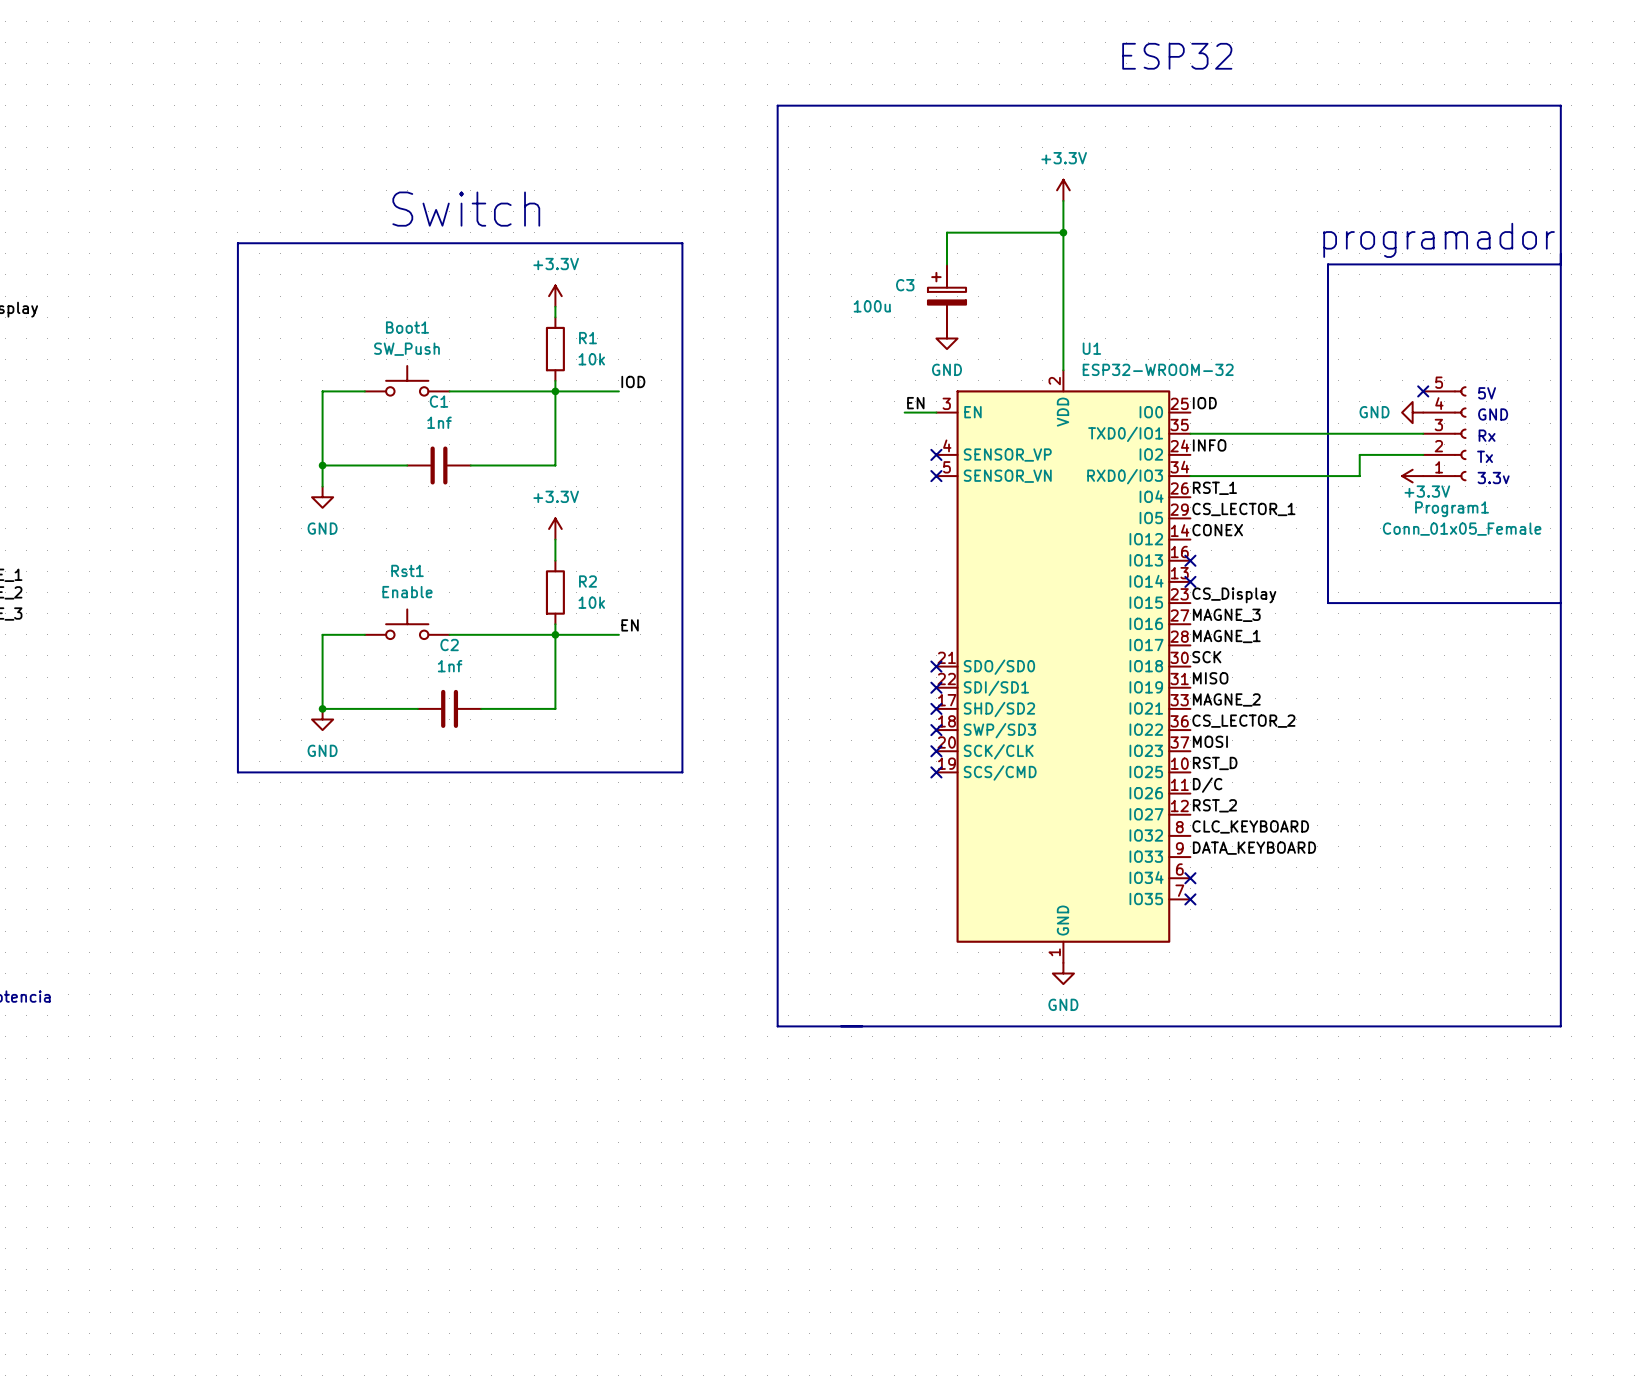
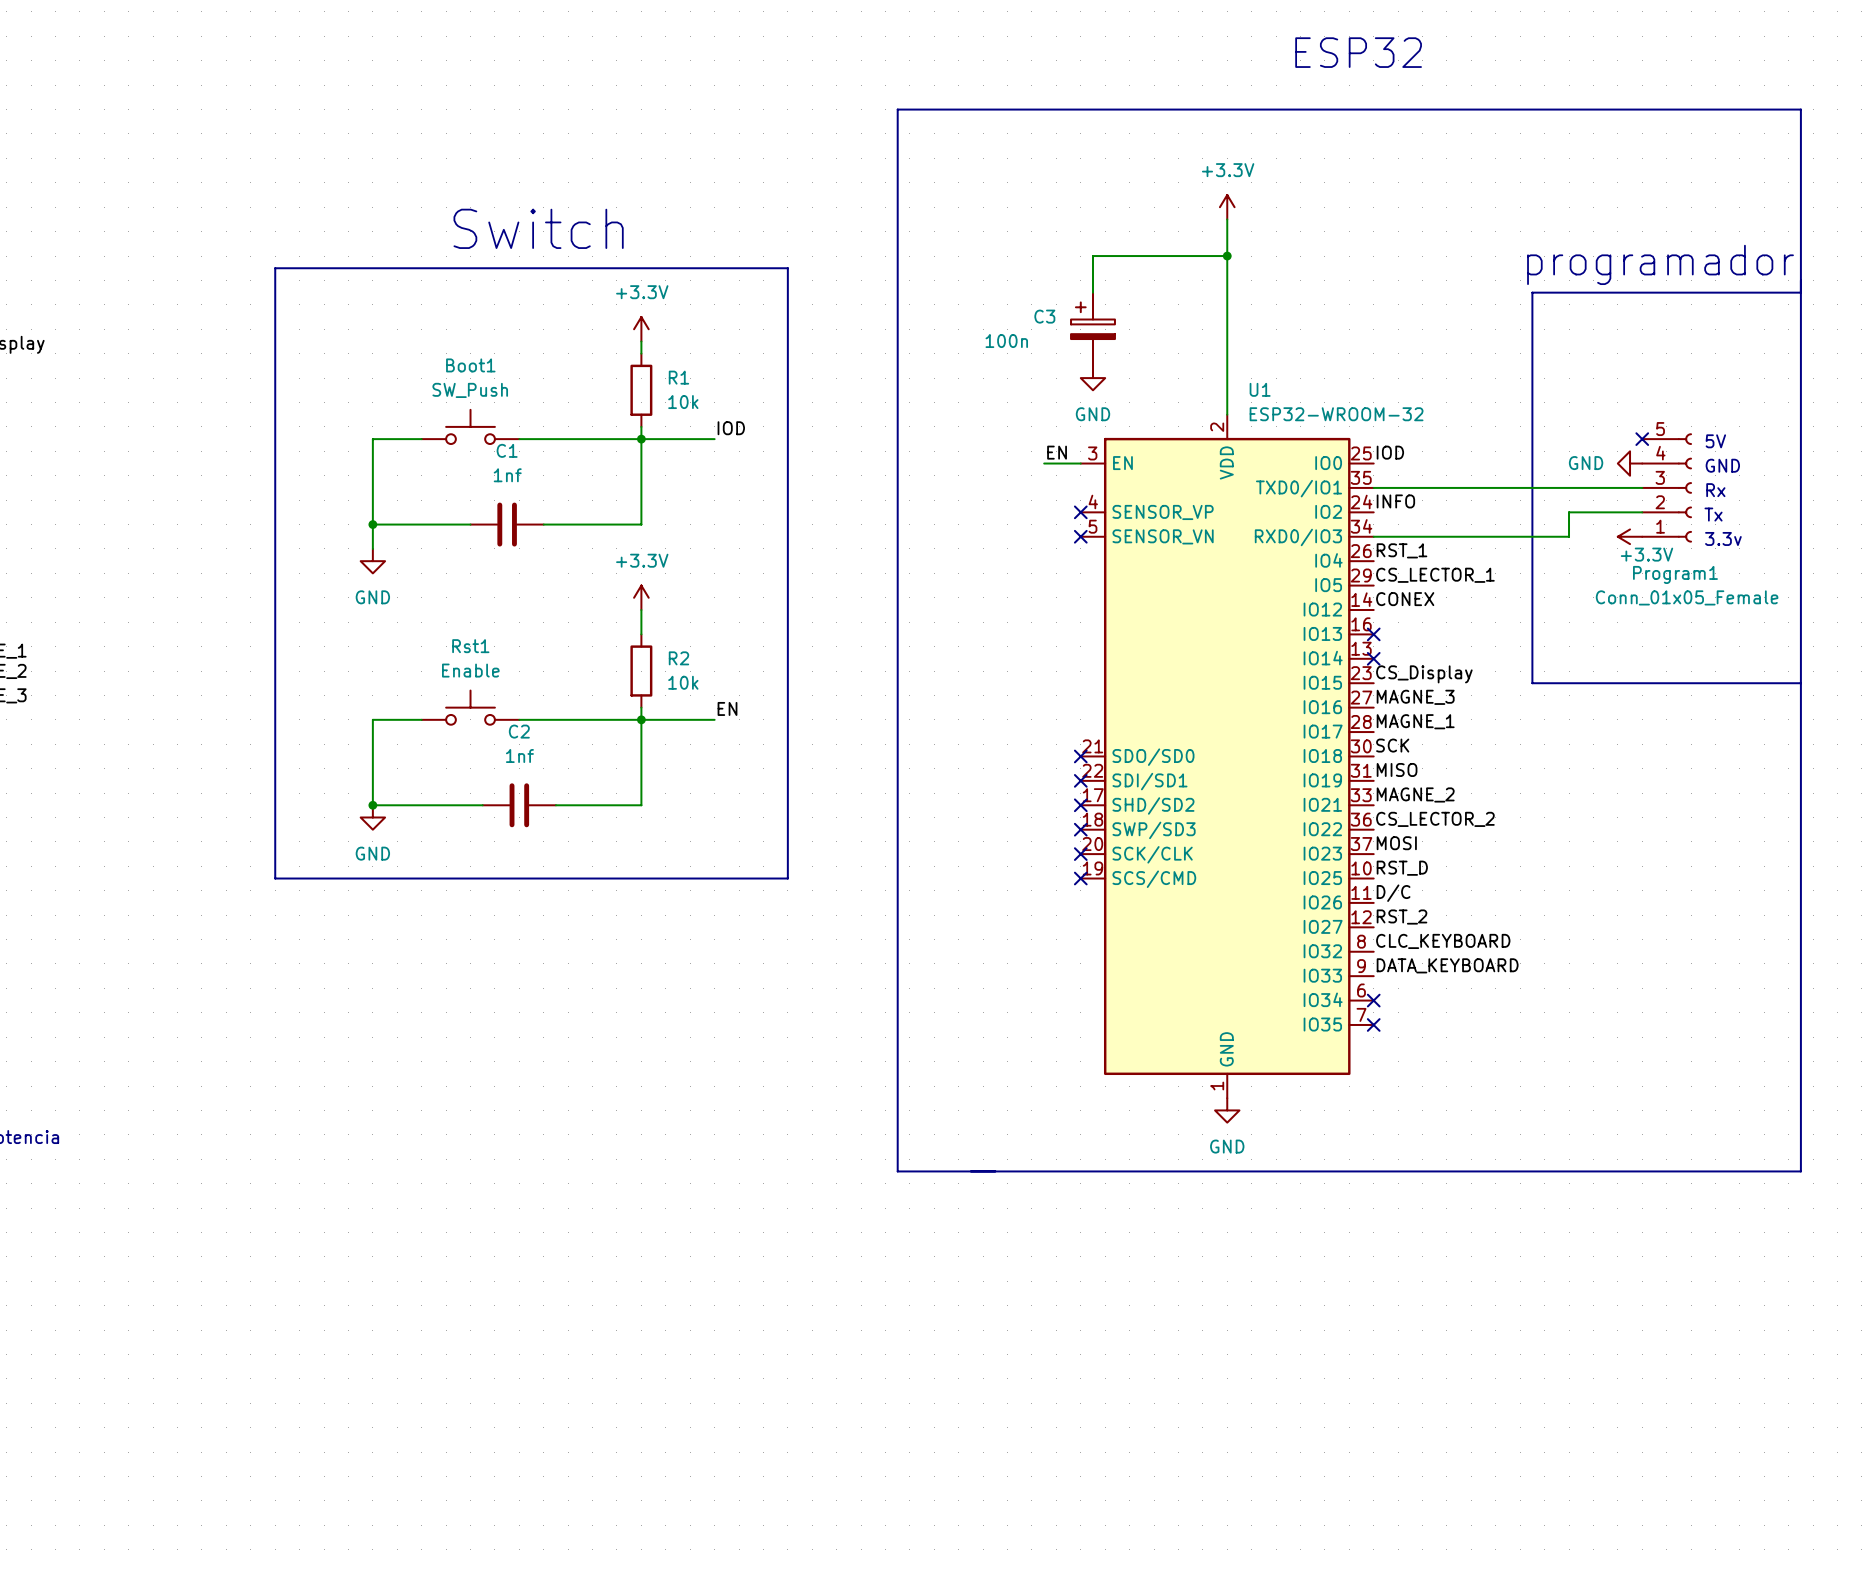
C3 value: 100u (872, 306) -> 100n (1006, 341)

